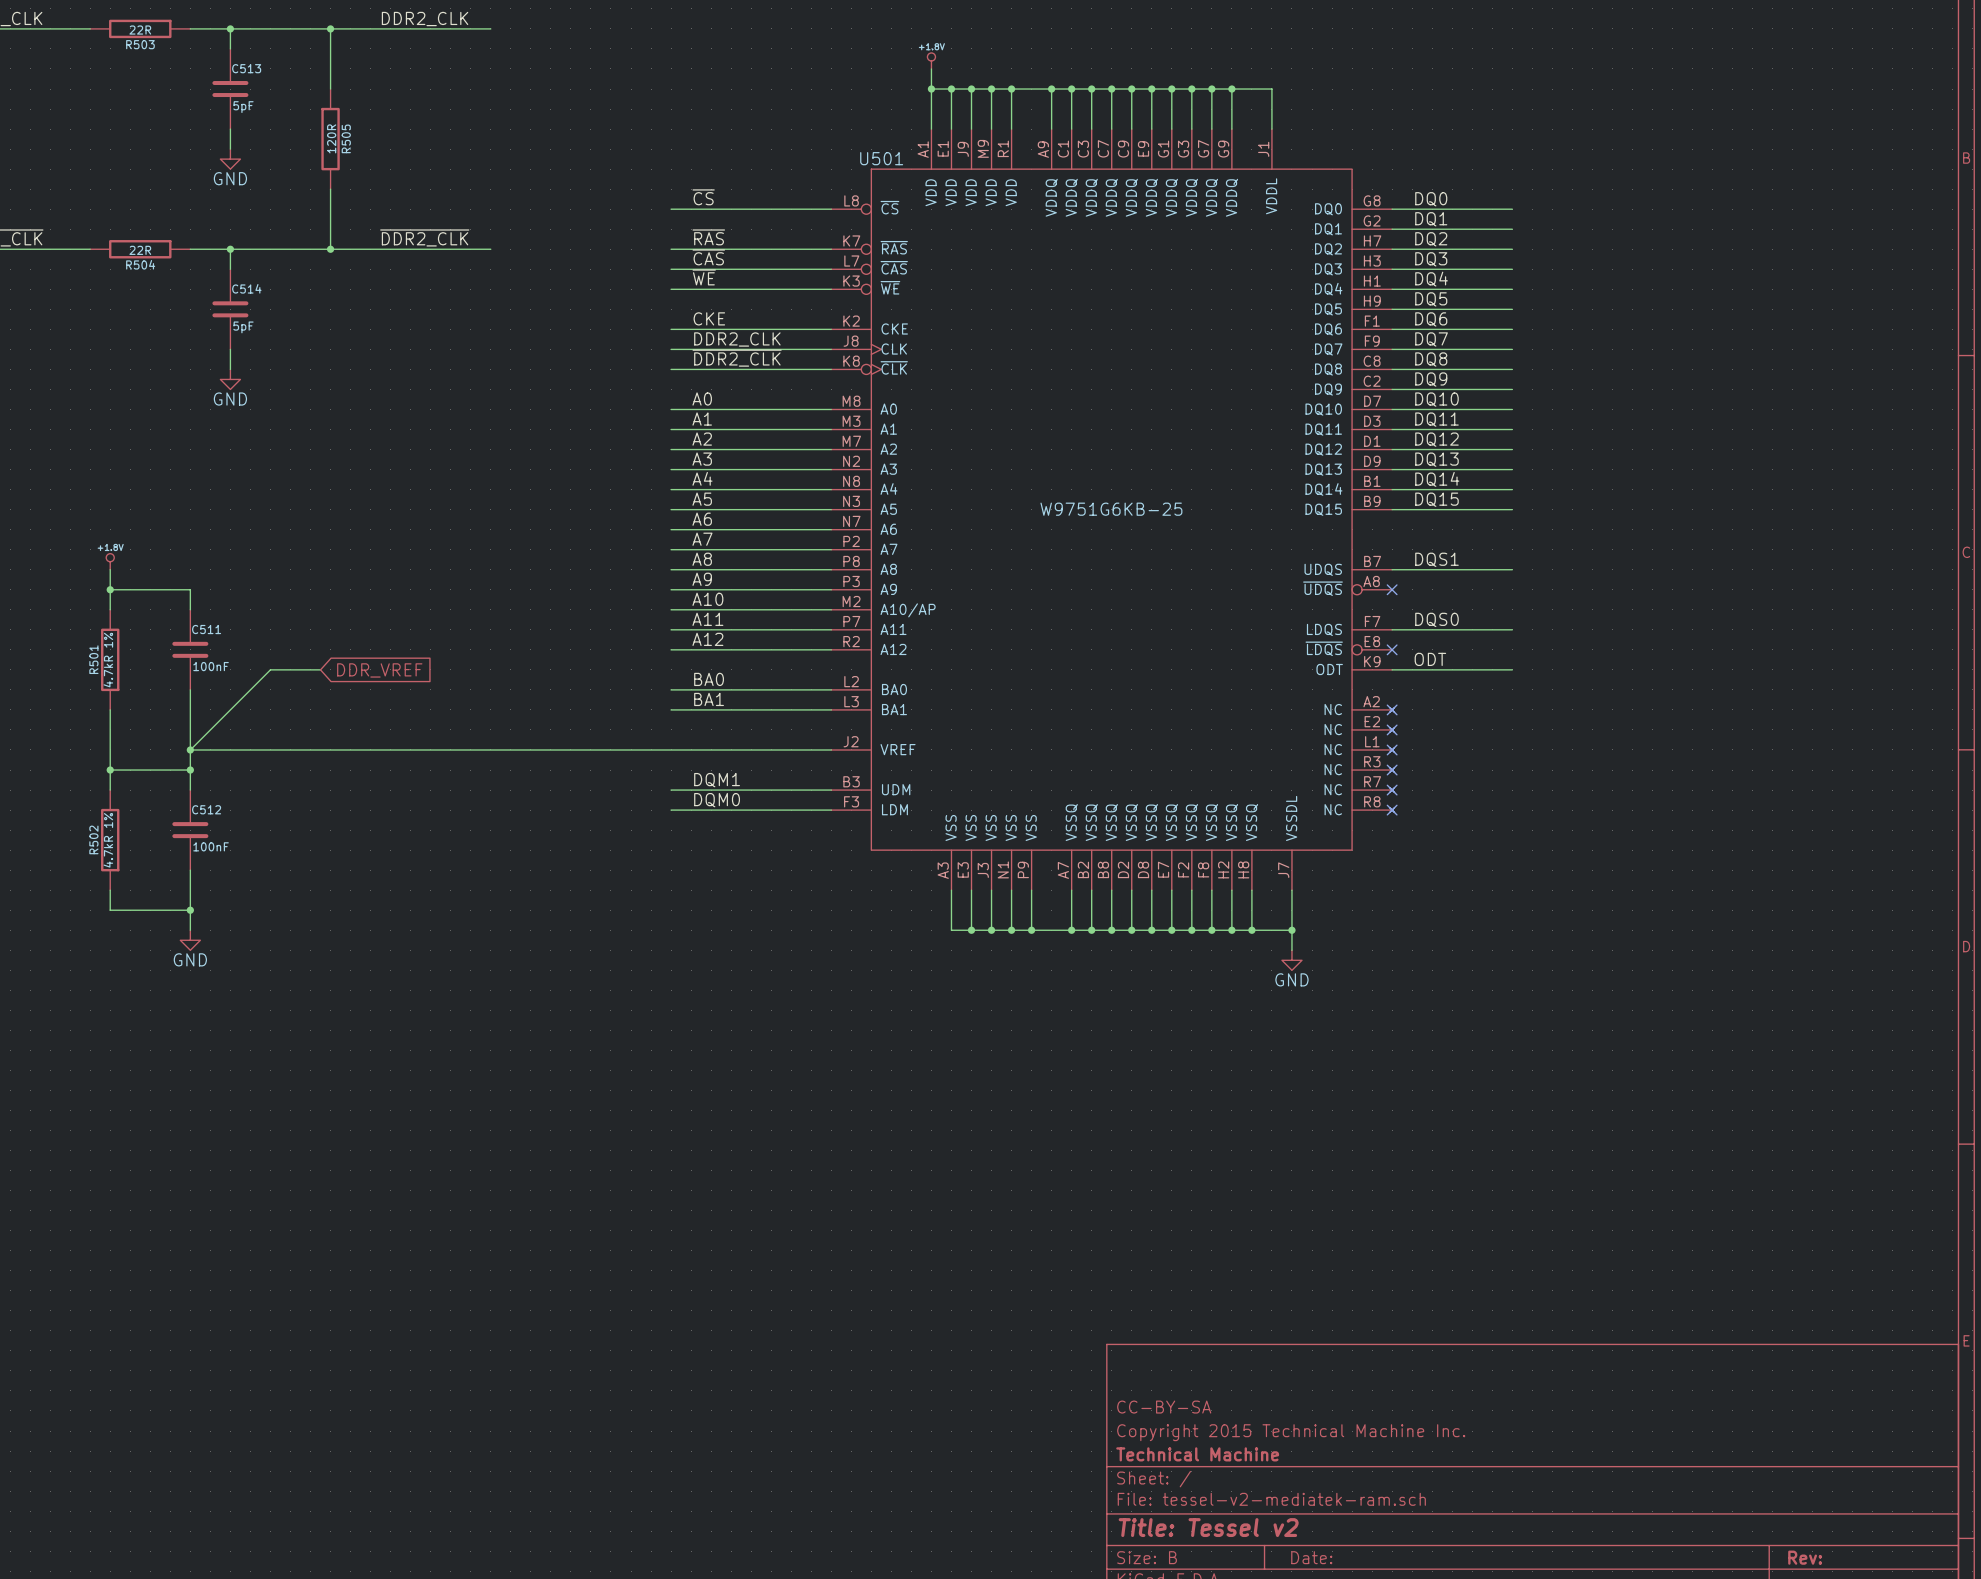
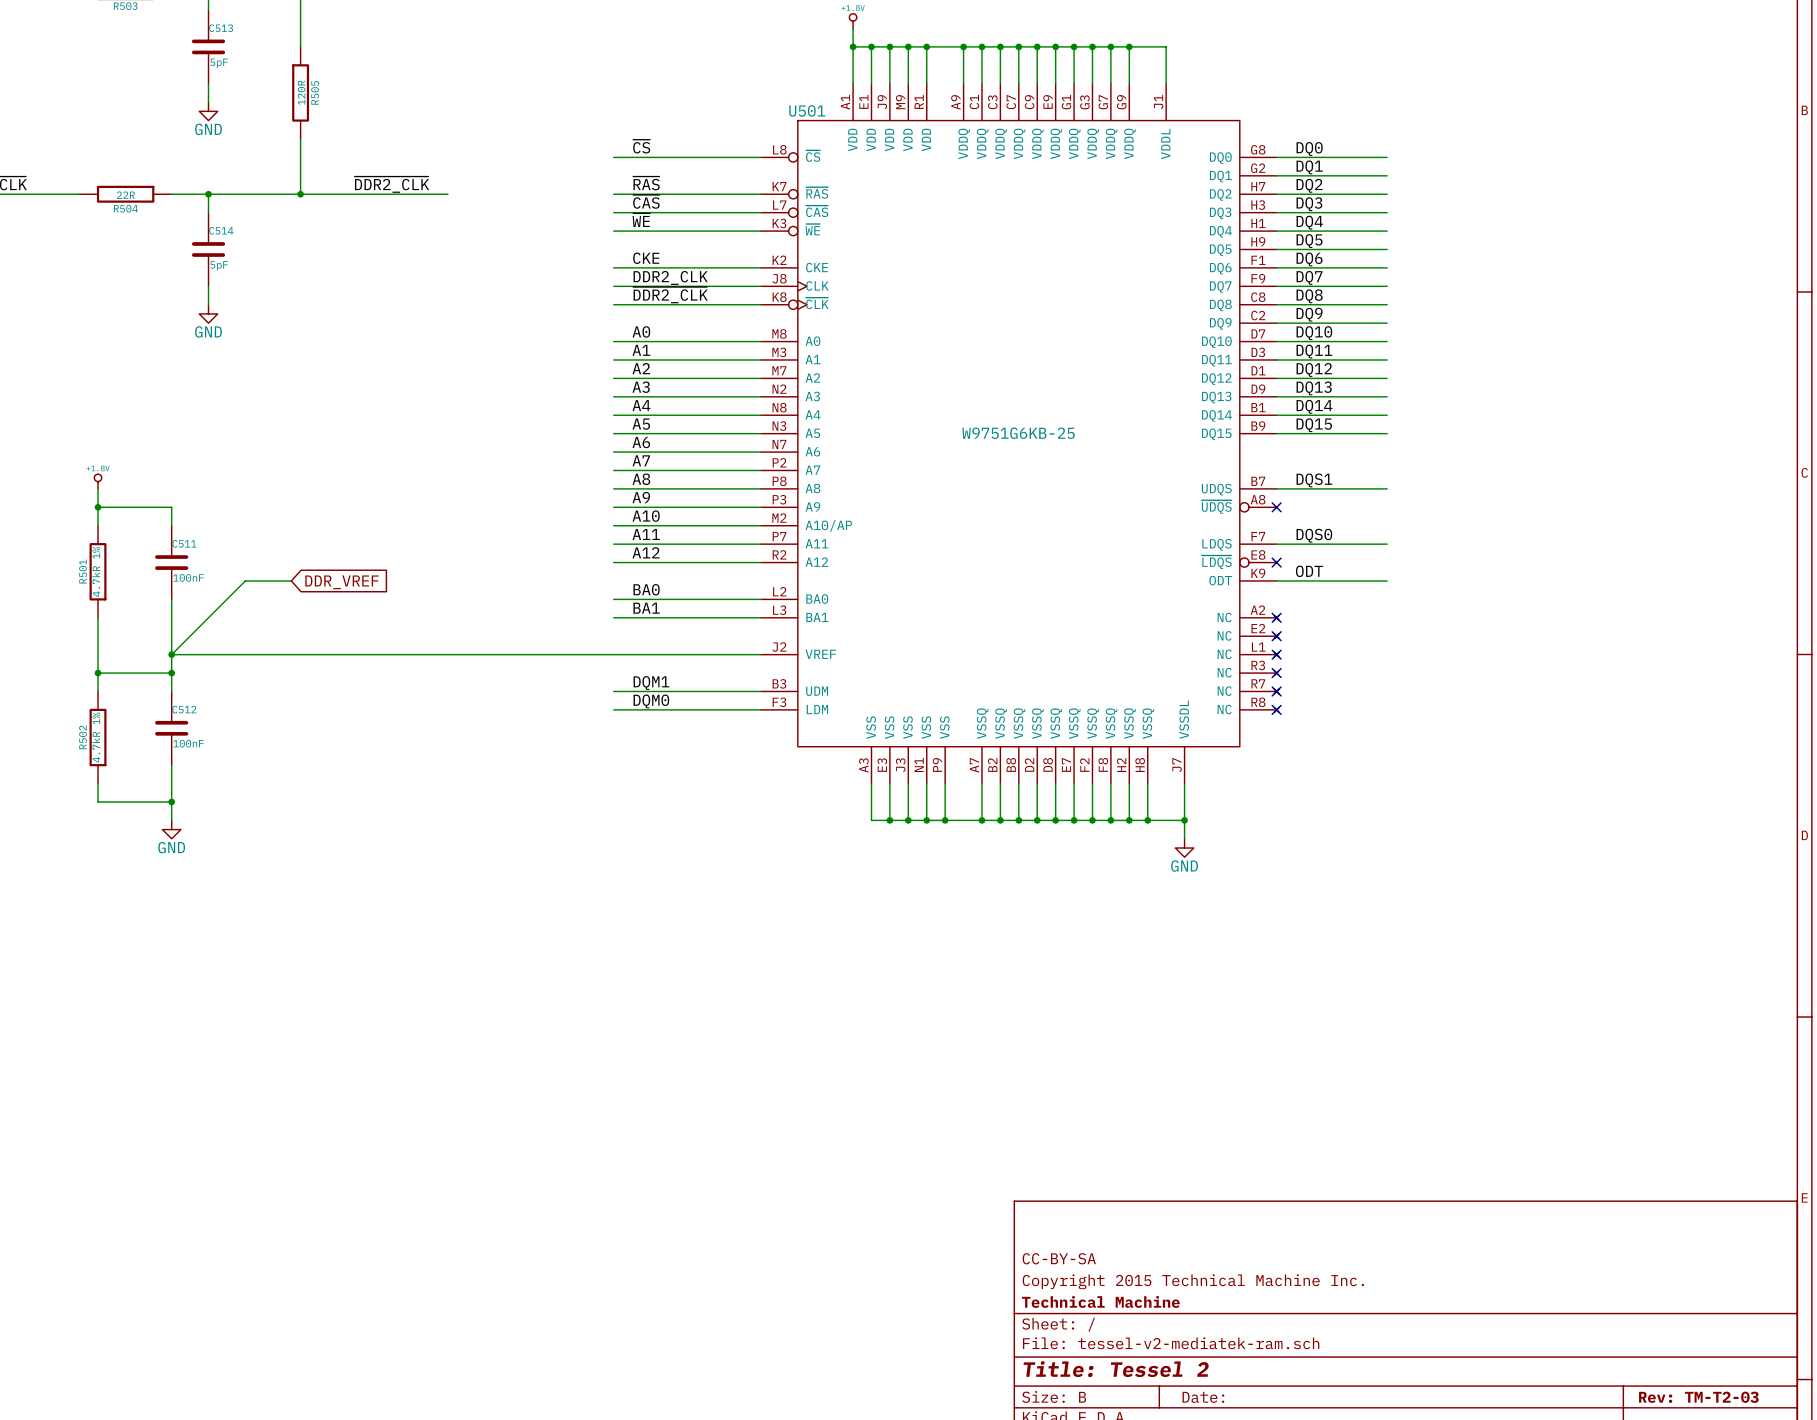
title block: Title: Tessel v2 (1208, 1527) -> Title: Tessel 2 (1116, 1369)
title block: Rev: (1805, 1557) -> Rev: TM-T2-03 (1698, 1397)

